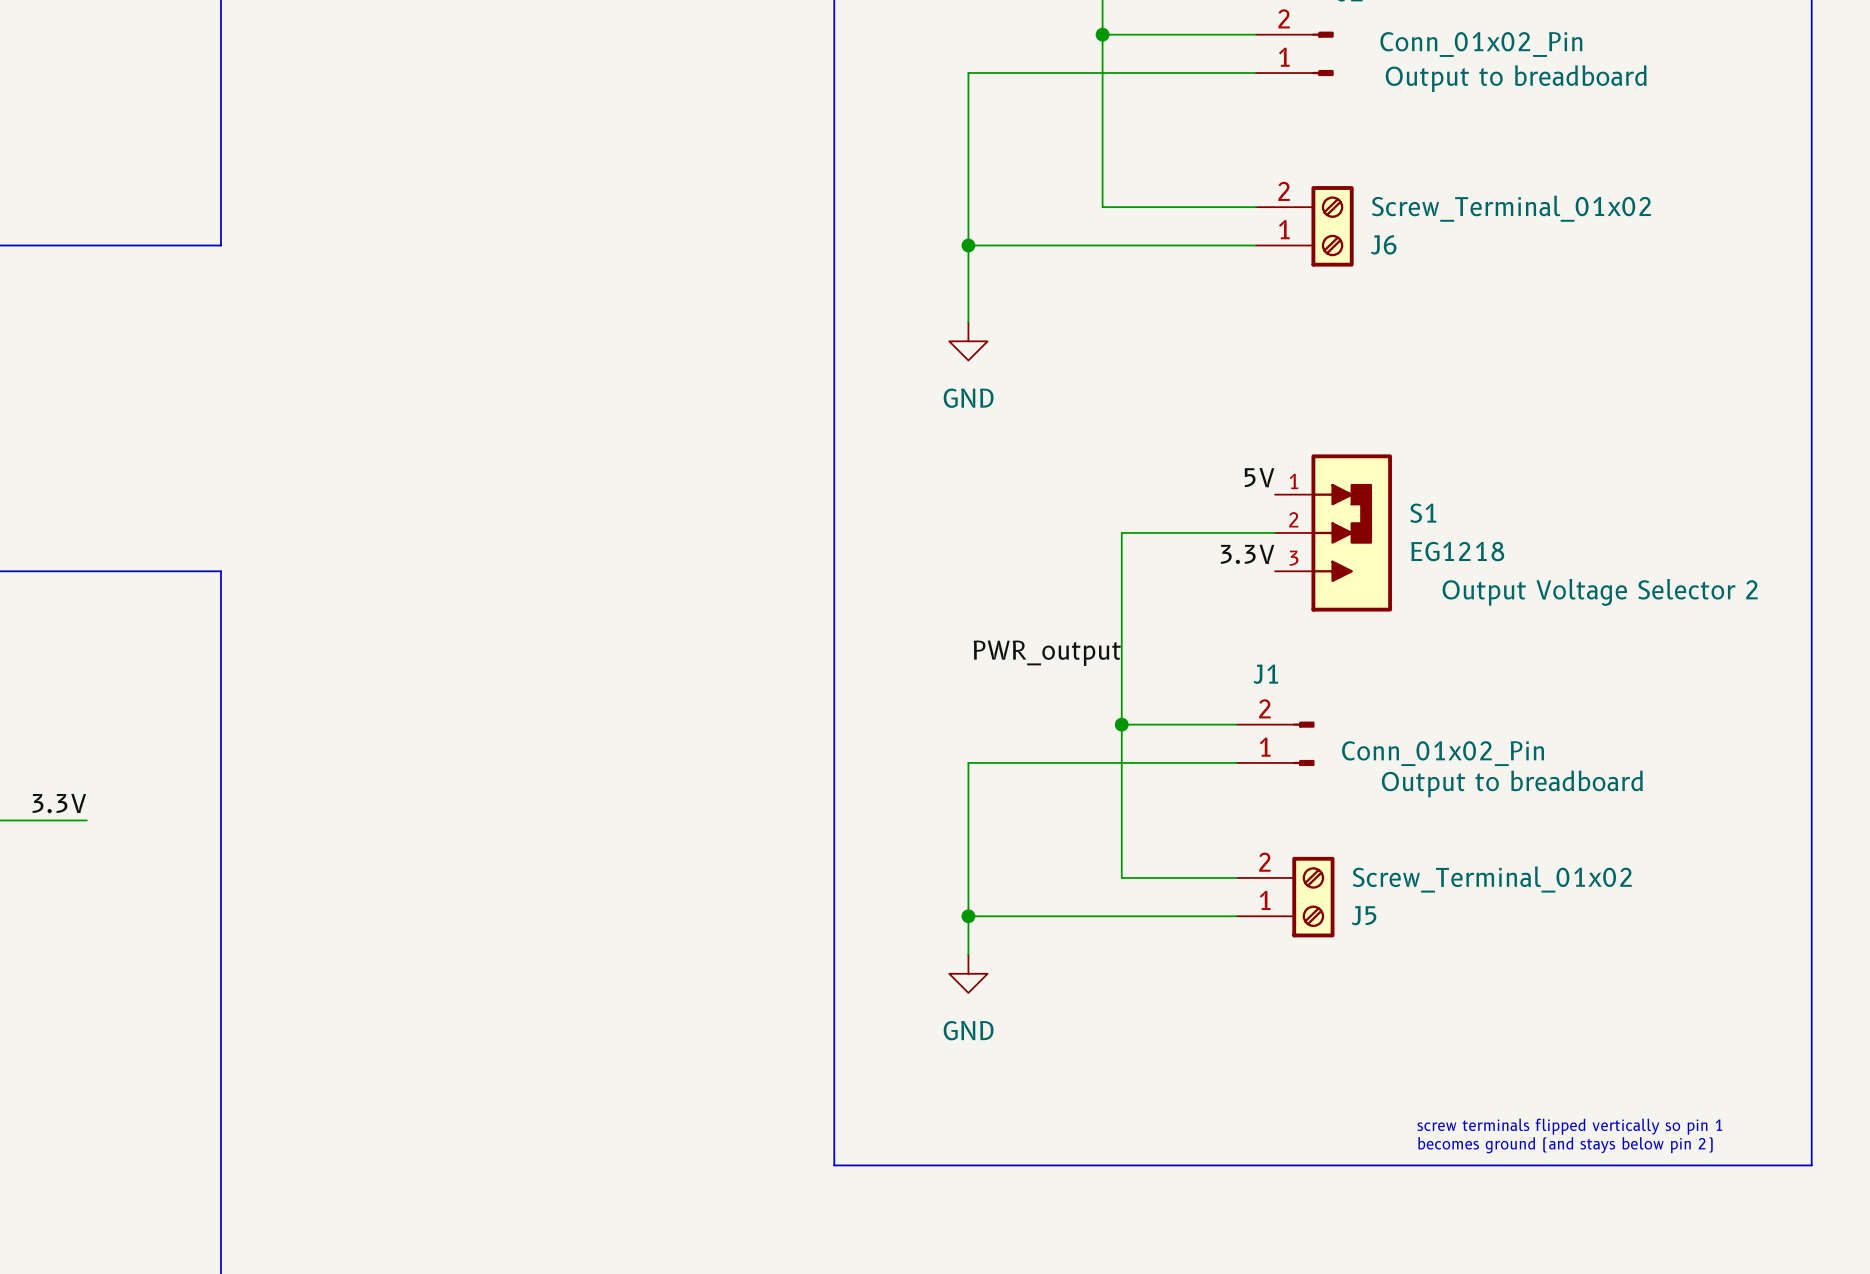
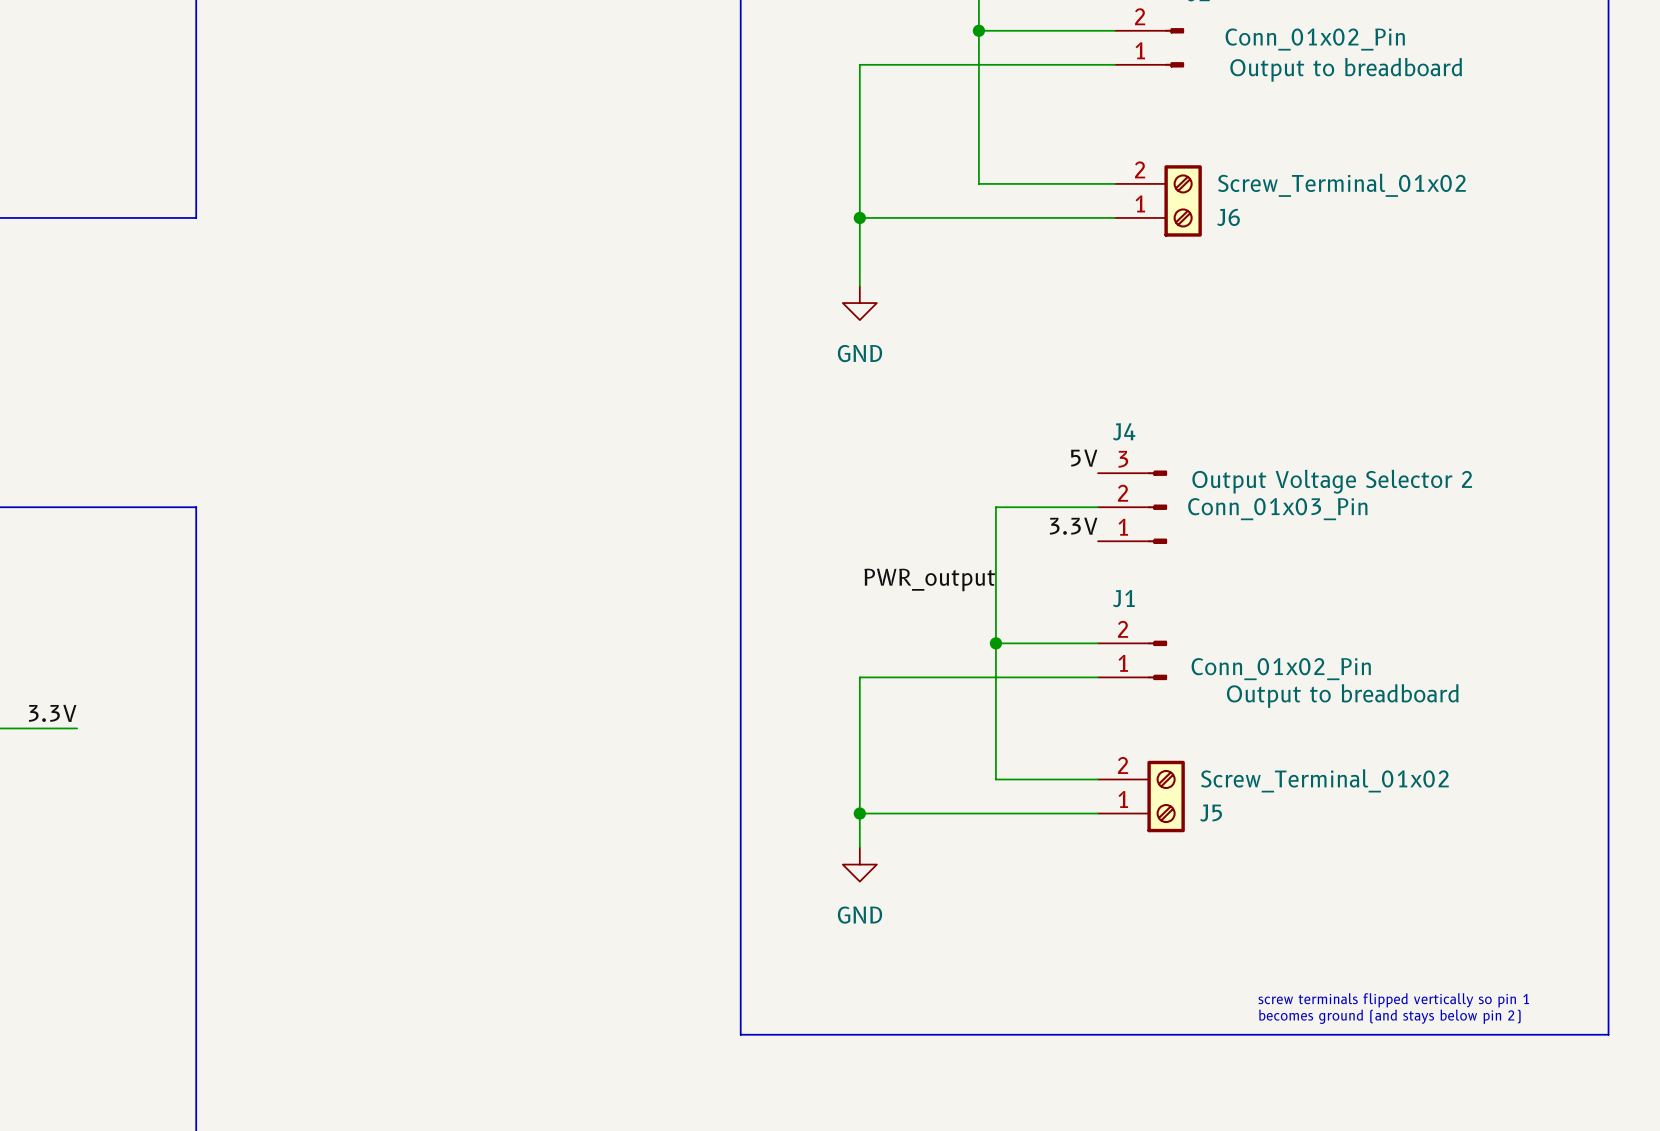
label position: 5V (1259, 477) -> 5V (1084, 458)
wire: (1275, 532) (1121, 532) (1121, 571) -> (1098, 507) (995, 507)
S1: EG1218 (1333, 532) -> none
label position: 3.3V (1247, 554) -> 3.3V (1073, 526)
J4: none -> Conn_01x03_Pin (1132, 507)

